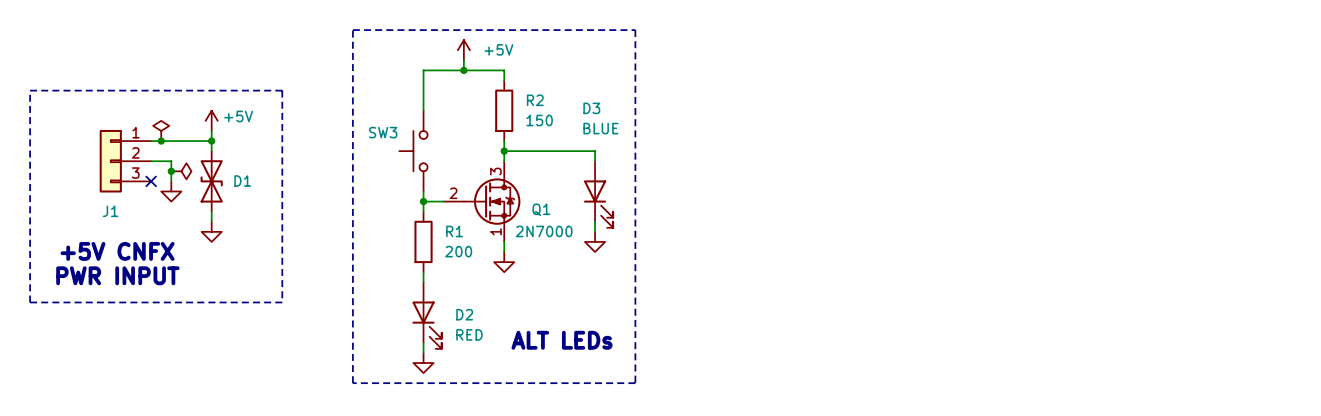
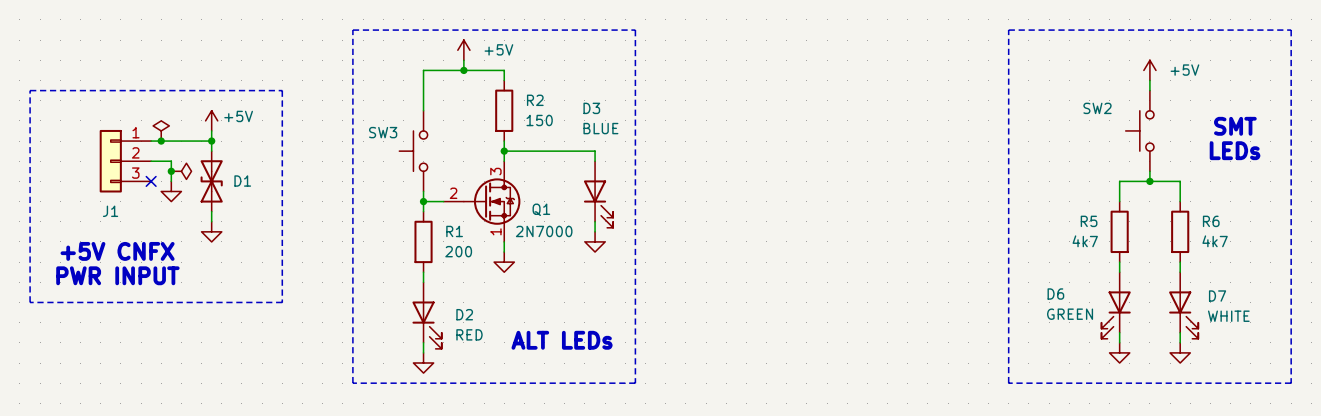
line: none -> (1008, 30) (1291, 30) (1291, 383) (1008, 383) (1008, 30)
power symbol: none -> +5V (1149, 70)
wire: none -> (1149, 80) (1149, 90)
text: none -> SMT (1235, 126)
SW2: none -> (1139, 130)
text: none -> LEDs (1235, 150)
wire: none -> (1149, 171) (1149, 181)
junction: none -> (1149, 181)
wire: none -> (1119, 201) (1119, 181) (1180, 181) (1180, 201)
R5: none -> 4k7 (1119, 231)
R6: none -> 4k7 (1180, 231)
wire: none -> (1119, 262) (1119, 272)
wire: none -> (1180, 262) (1180, 272)
D6: none -> GREEN (1116, 305)
D7: none -> WHITE (1183, 305)
wire: none -> (1119, 332) (1119, 342)
wire: none -> (1180, 332) (1180, 342)
power symbol: none -> (1119, 352)
power symbol: none -> (1180, 352)

